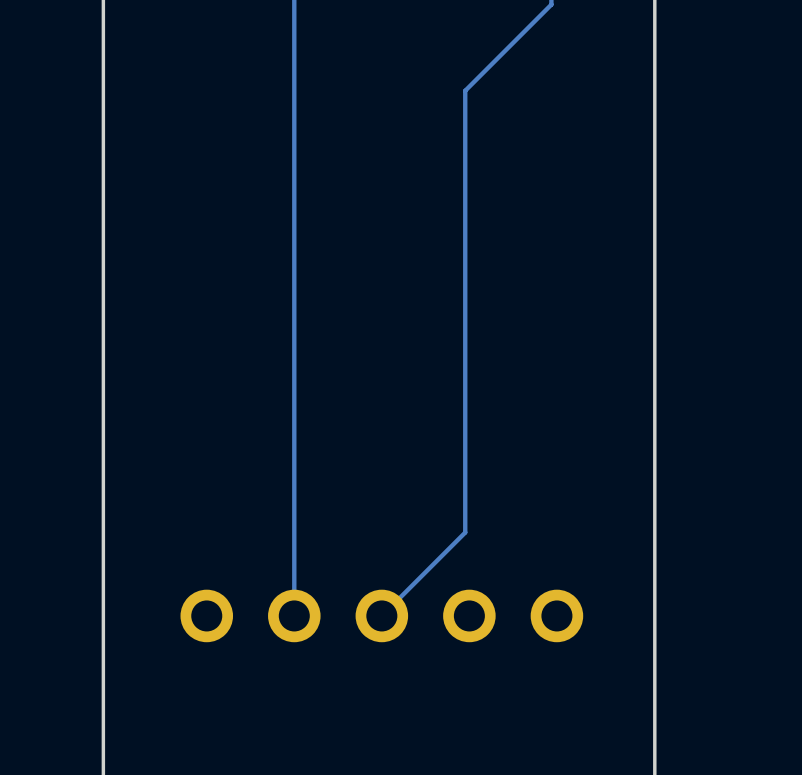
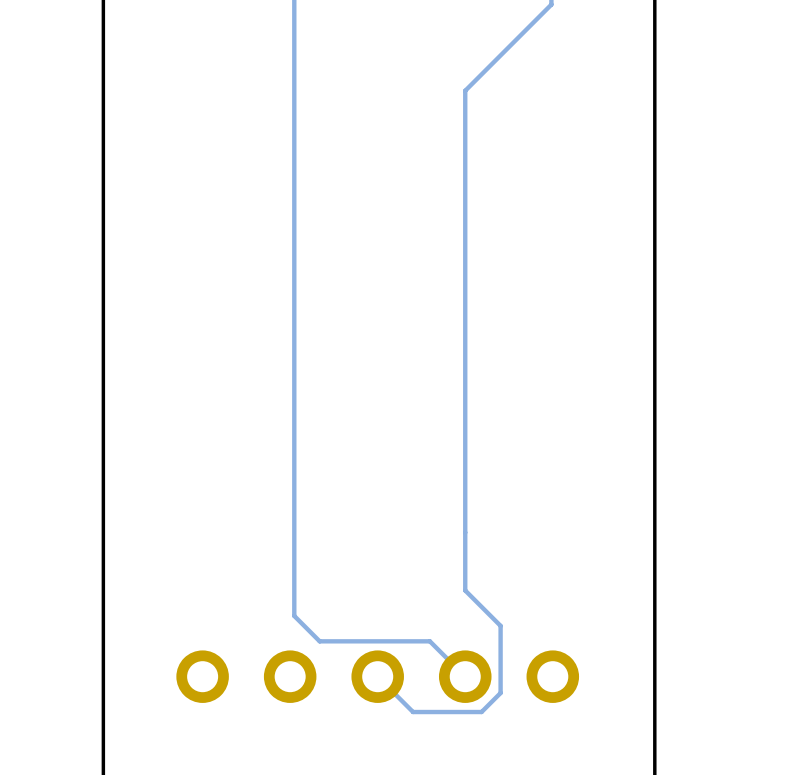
track: (465, 532) (381, 615) -> (465, 532) (465, 590) (500, 625) (500, 693) (481, 712) (413, 712) (377, 676)
track: none -> (294, 615) (319, 641) (429, 641) (465, 676)
part position: (381, 615) -> (377, 676)

